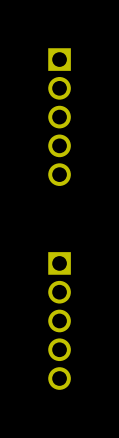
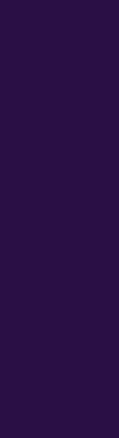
part: (59, 117) -> none
part: (59, 320) -> none

